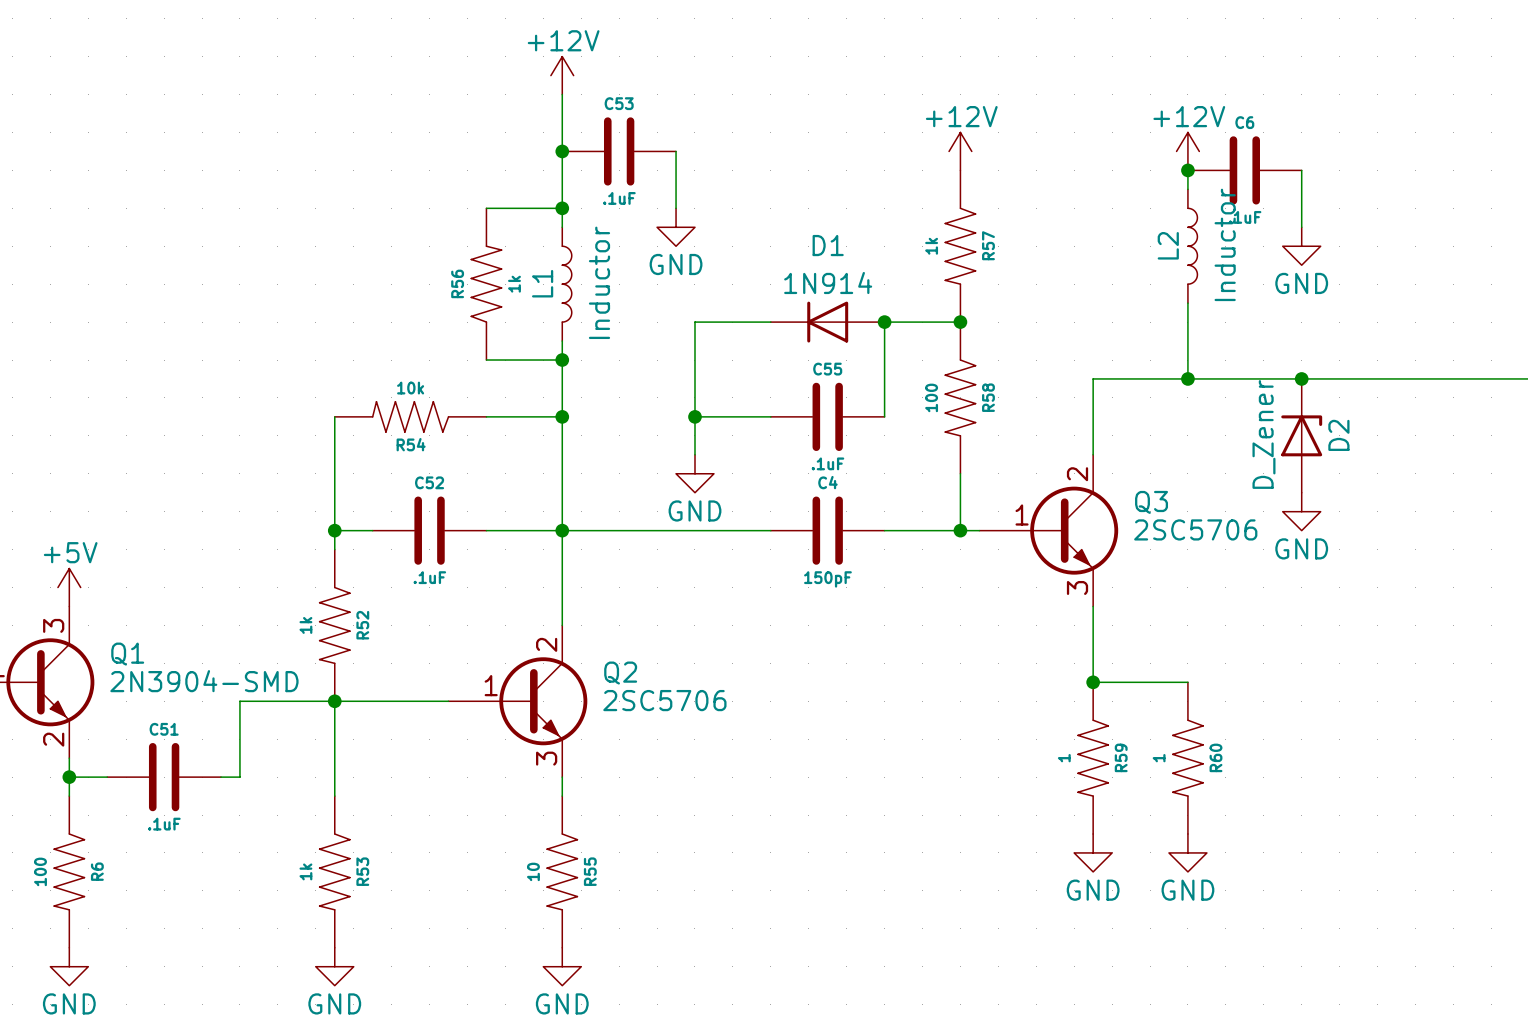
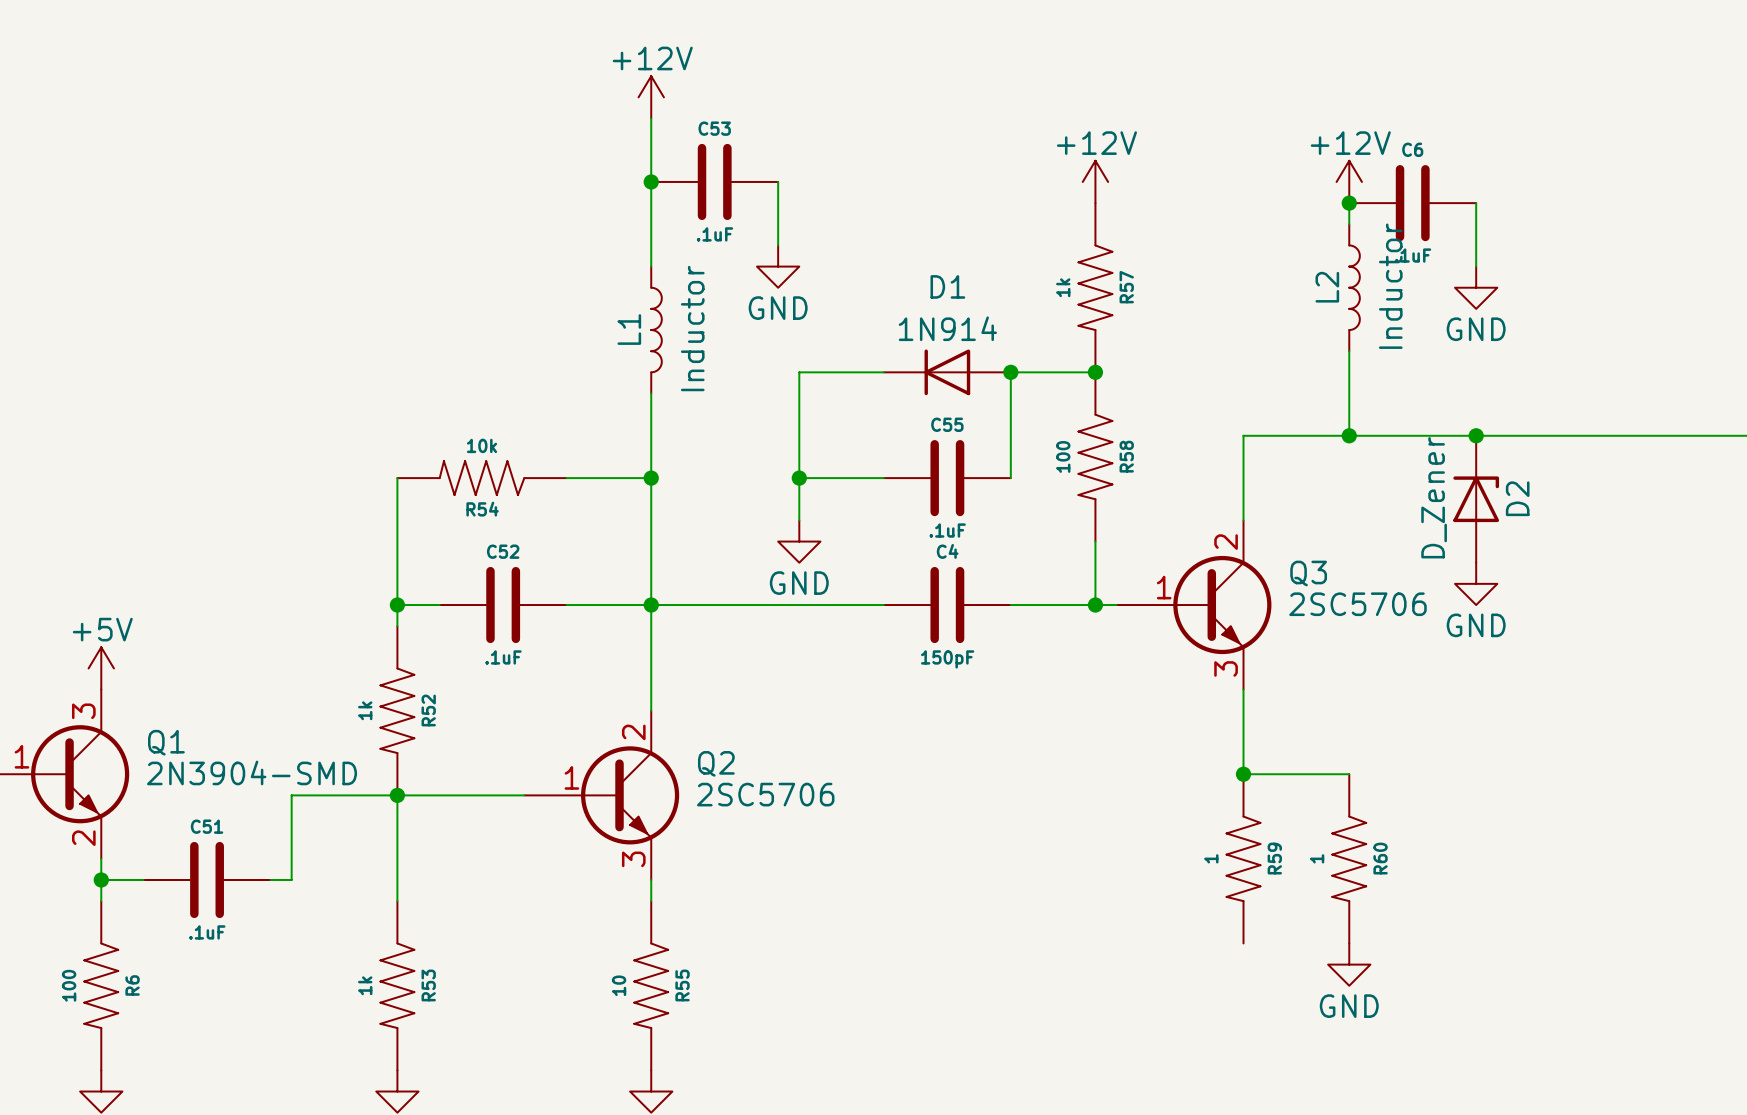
wire: (486, 208) (562, 208) -> none
junction: (562, 208) -> none
R56: 1k (486, 284) -> none
wire: (486, 360) (562, 360) -> none
junction: (562, 360) -> none
power symbol: GND (1093, 852) -> none

